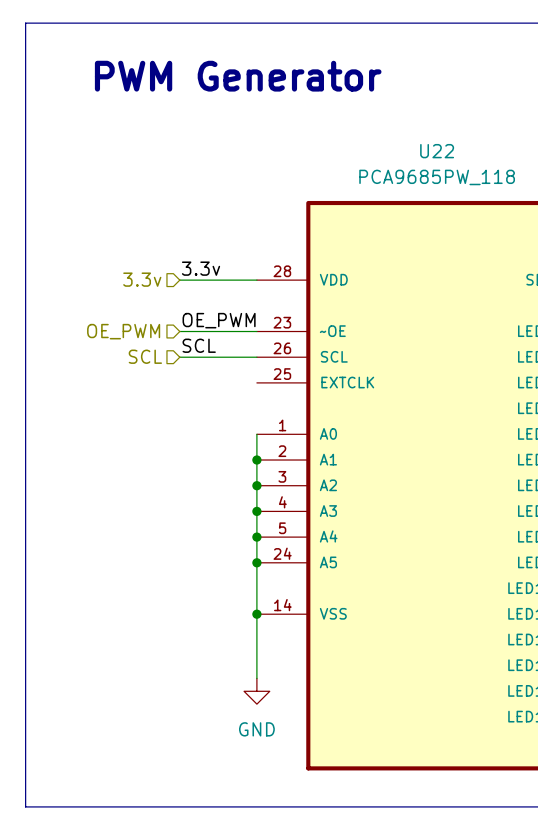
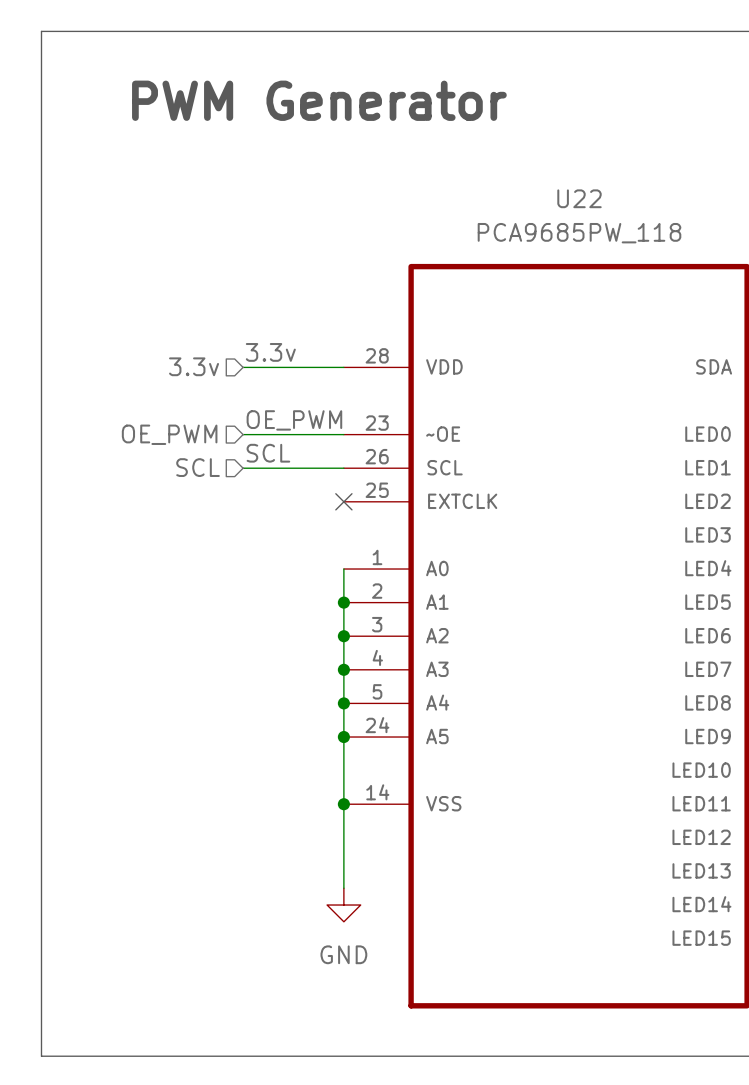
no-connect mark: none -> (343, 501)

